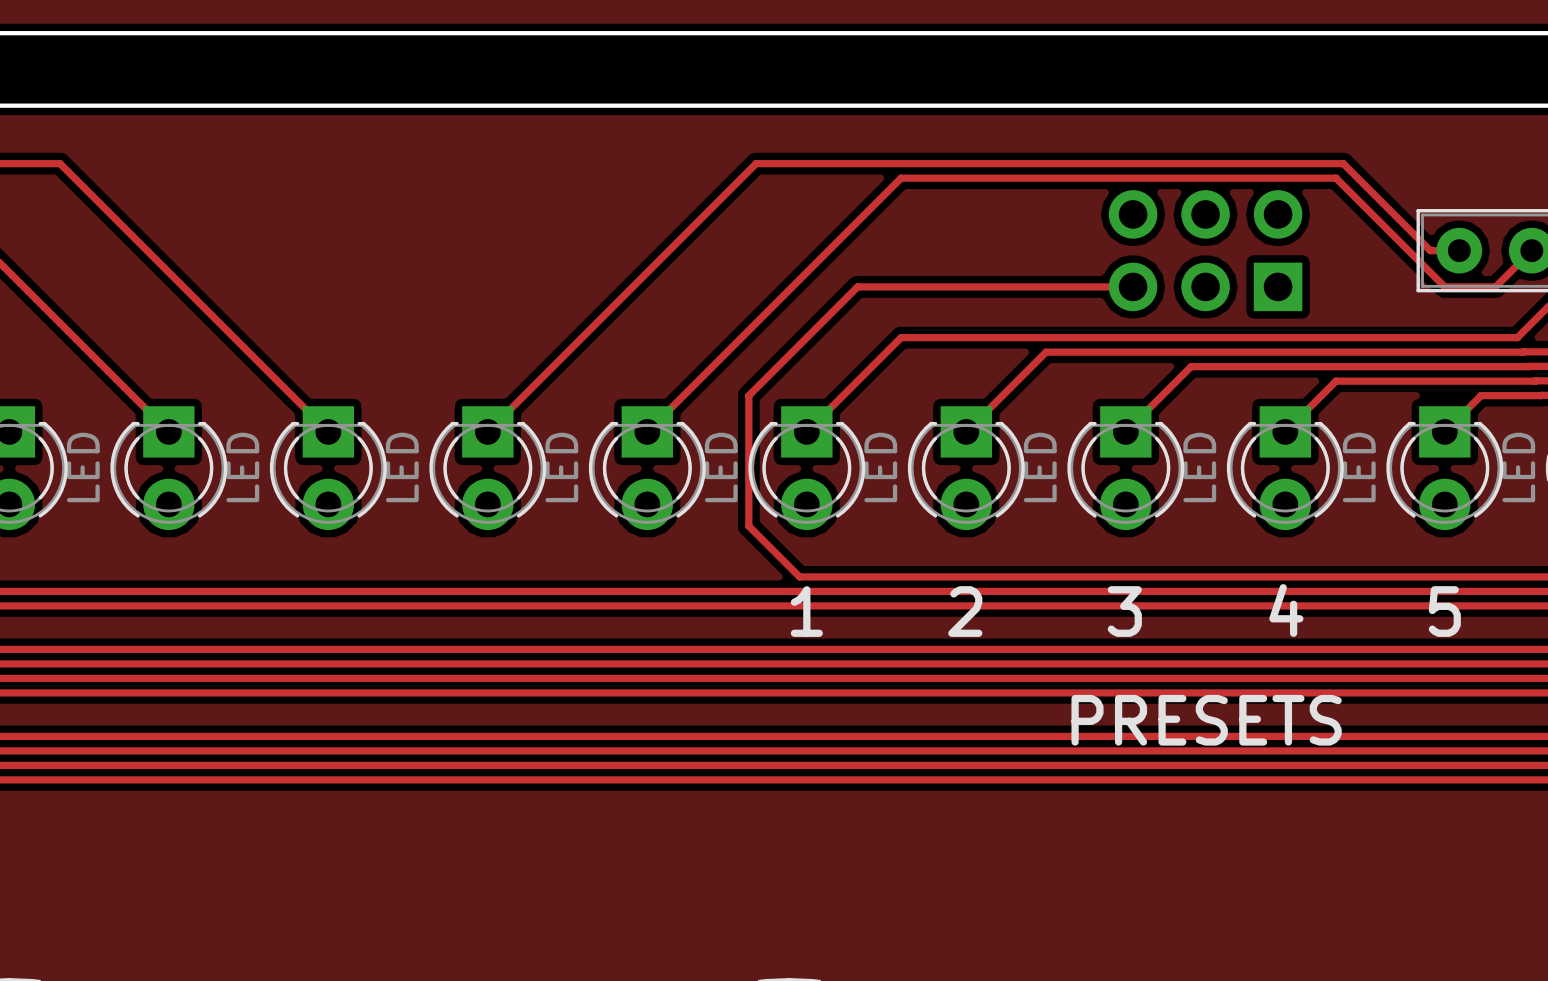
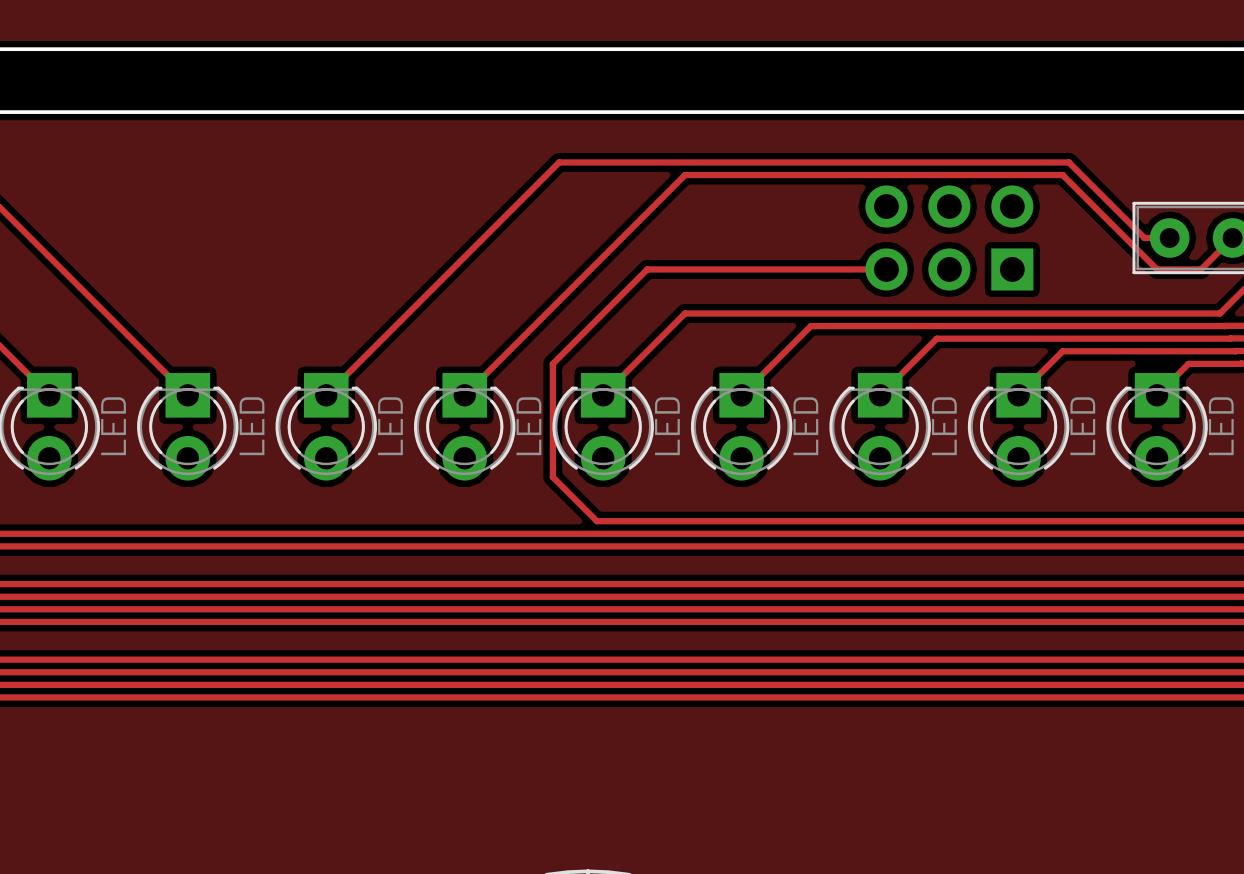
text: 4 (1286, 610) -> none
text: 1 (806, 611) -> none
text: 2 (965, 611) -> none
text: 3 (1124, 611) -> none
text: 5 (1444, 611) -> none
text: PRESETS (1206, 720) -> none

